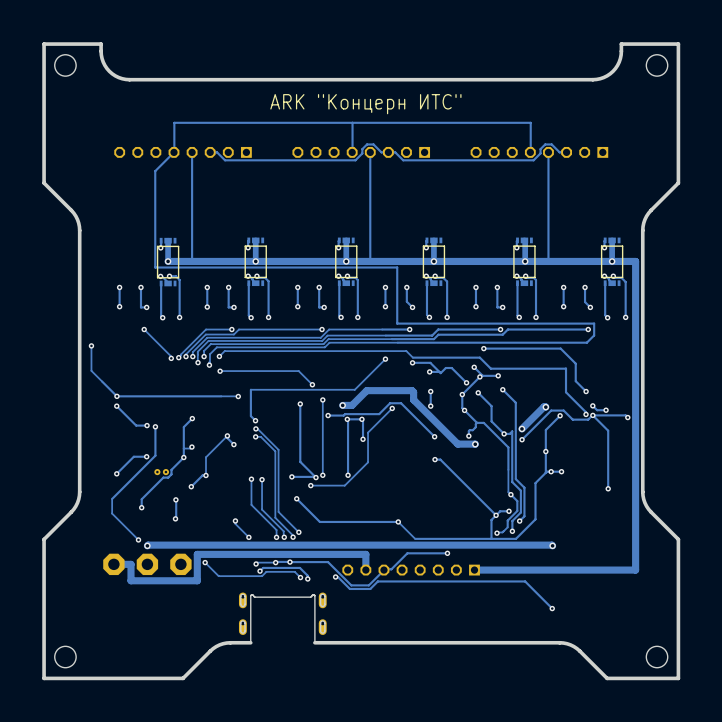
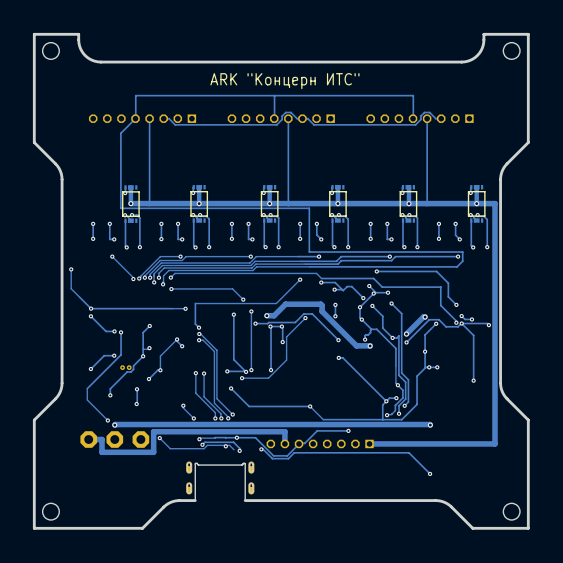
via: (275, 562) -> none
via: (289, 562) -> none
via: none -> (236, 437)
via: none -> (225, 446)
via: (300, 577) -> none

